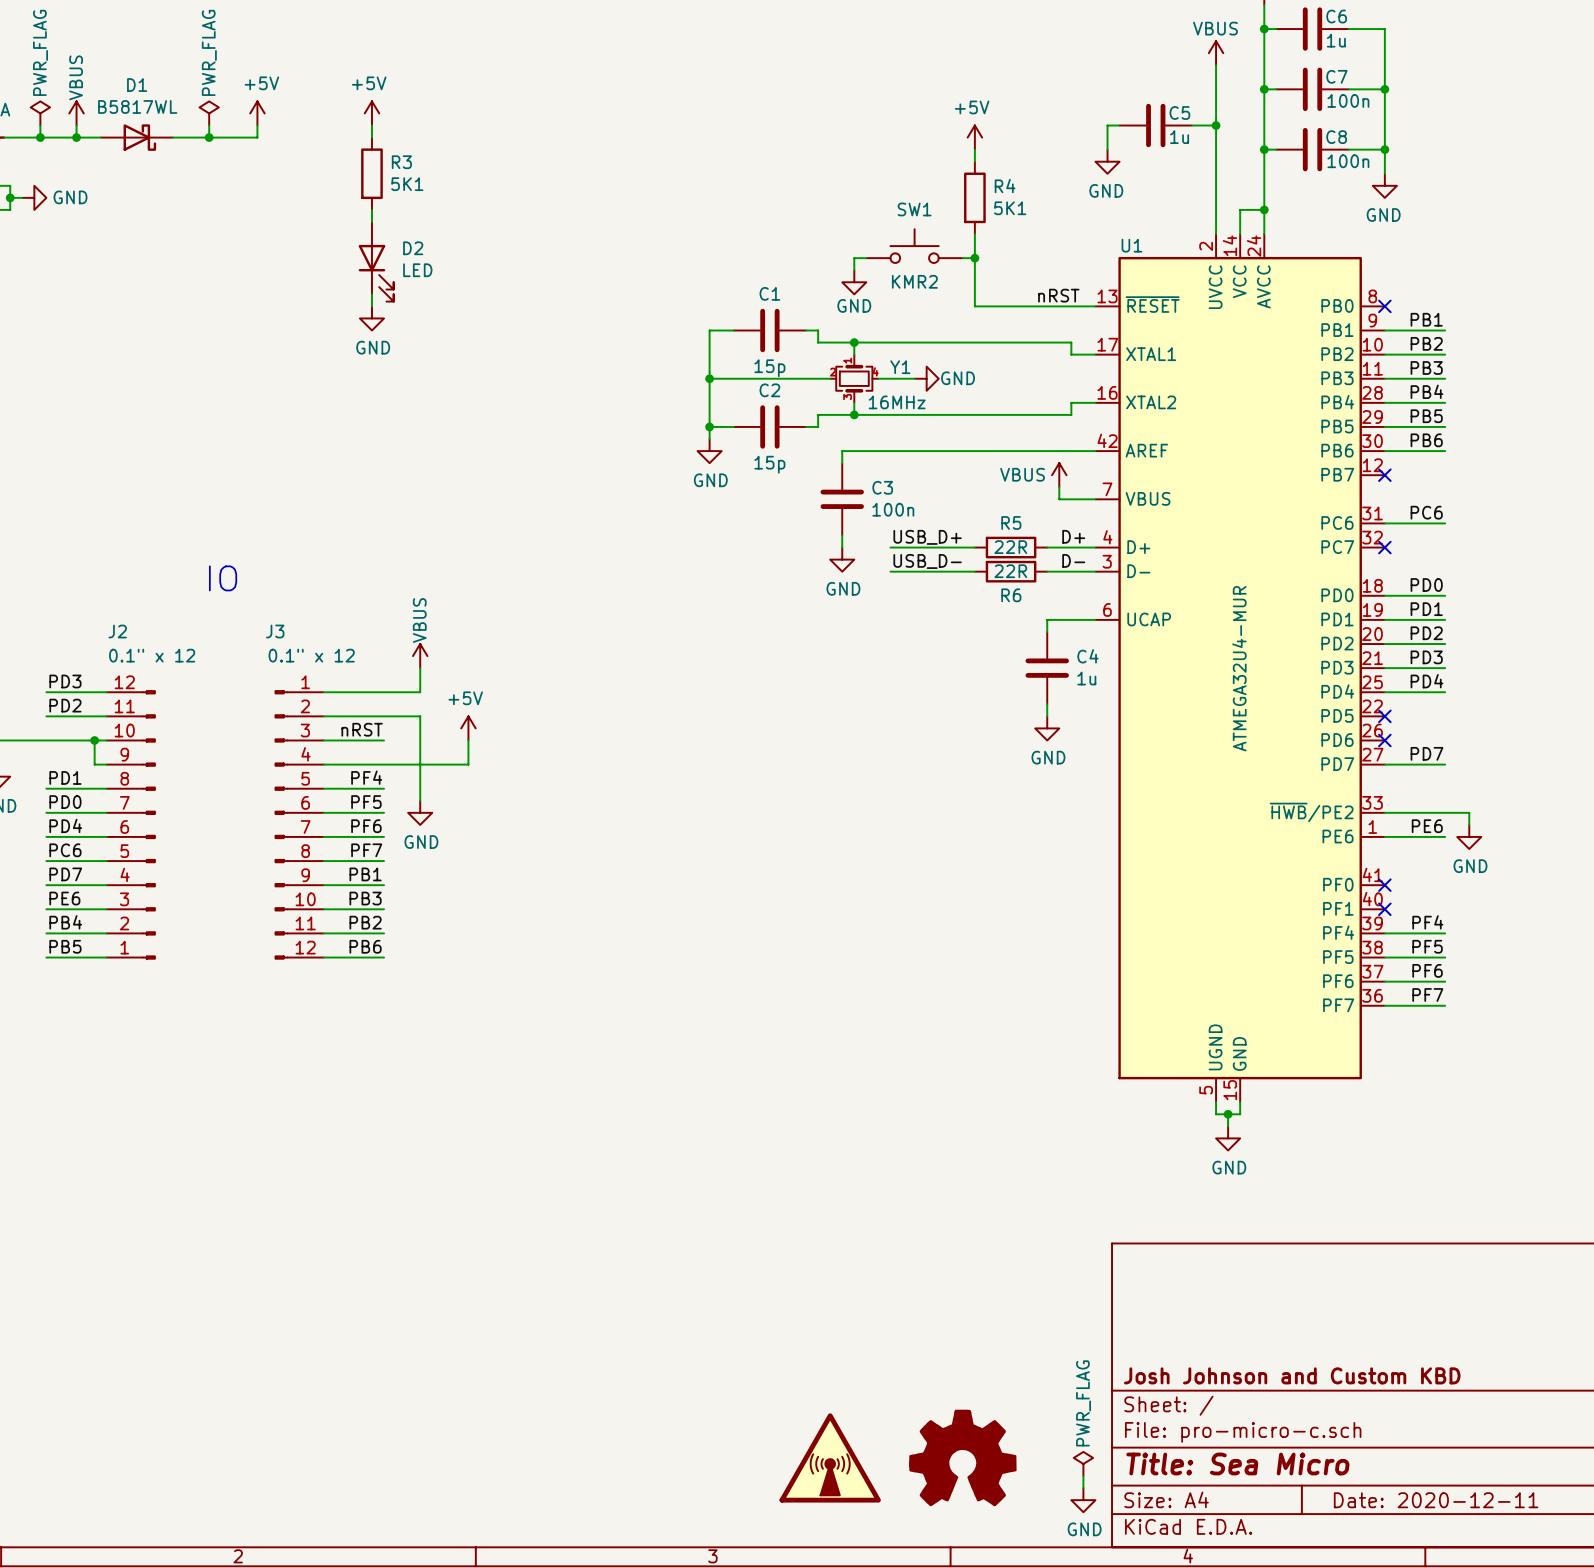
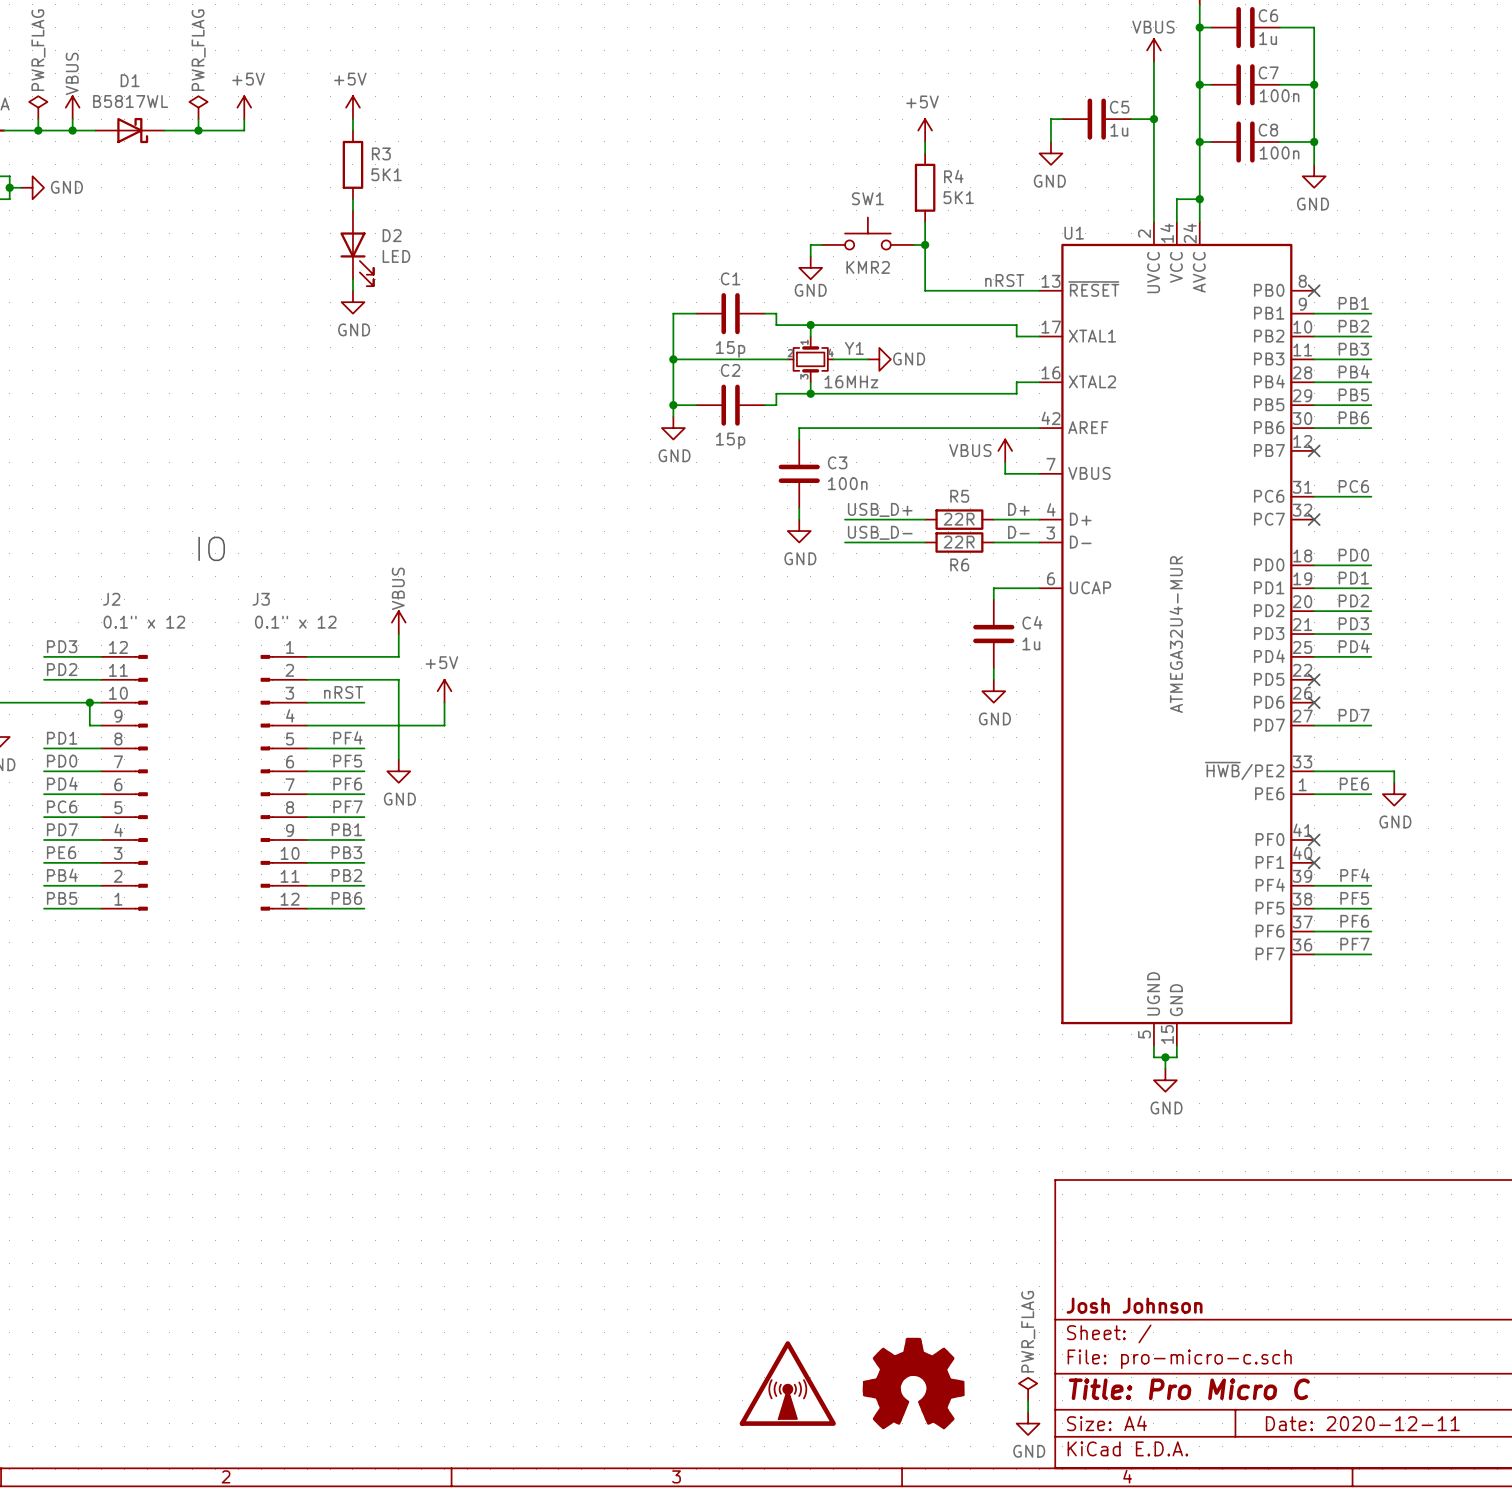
title block: Josh Johnson and Custom KBD (1292, 1375) -> Josh Johnson (1134, 1305)
title block: Title: Sea Micro (1237, 1464) -> Title: Pro Micro C (1189, 1389)

